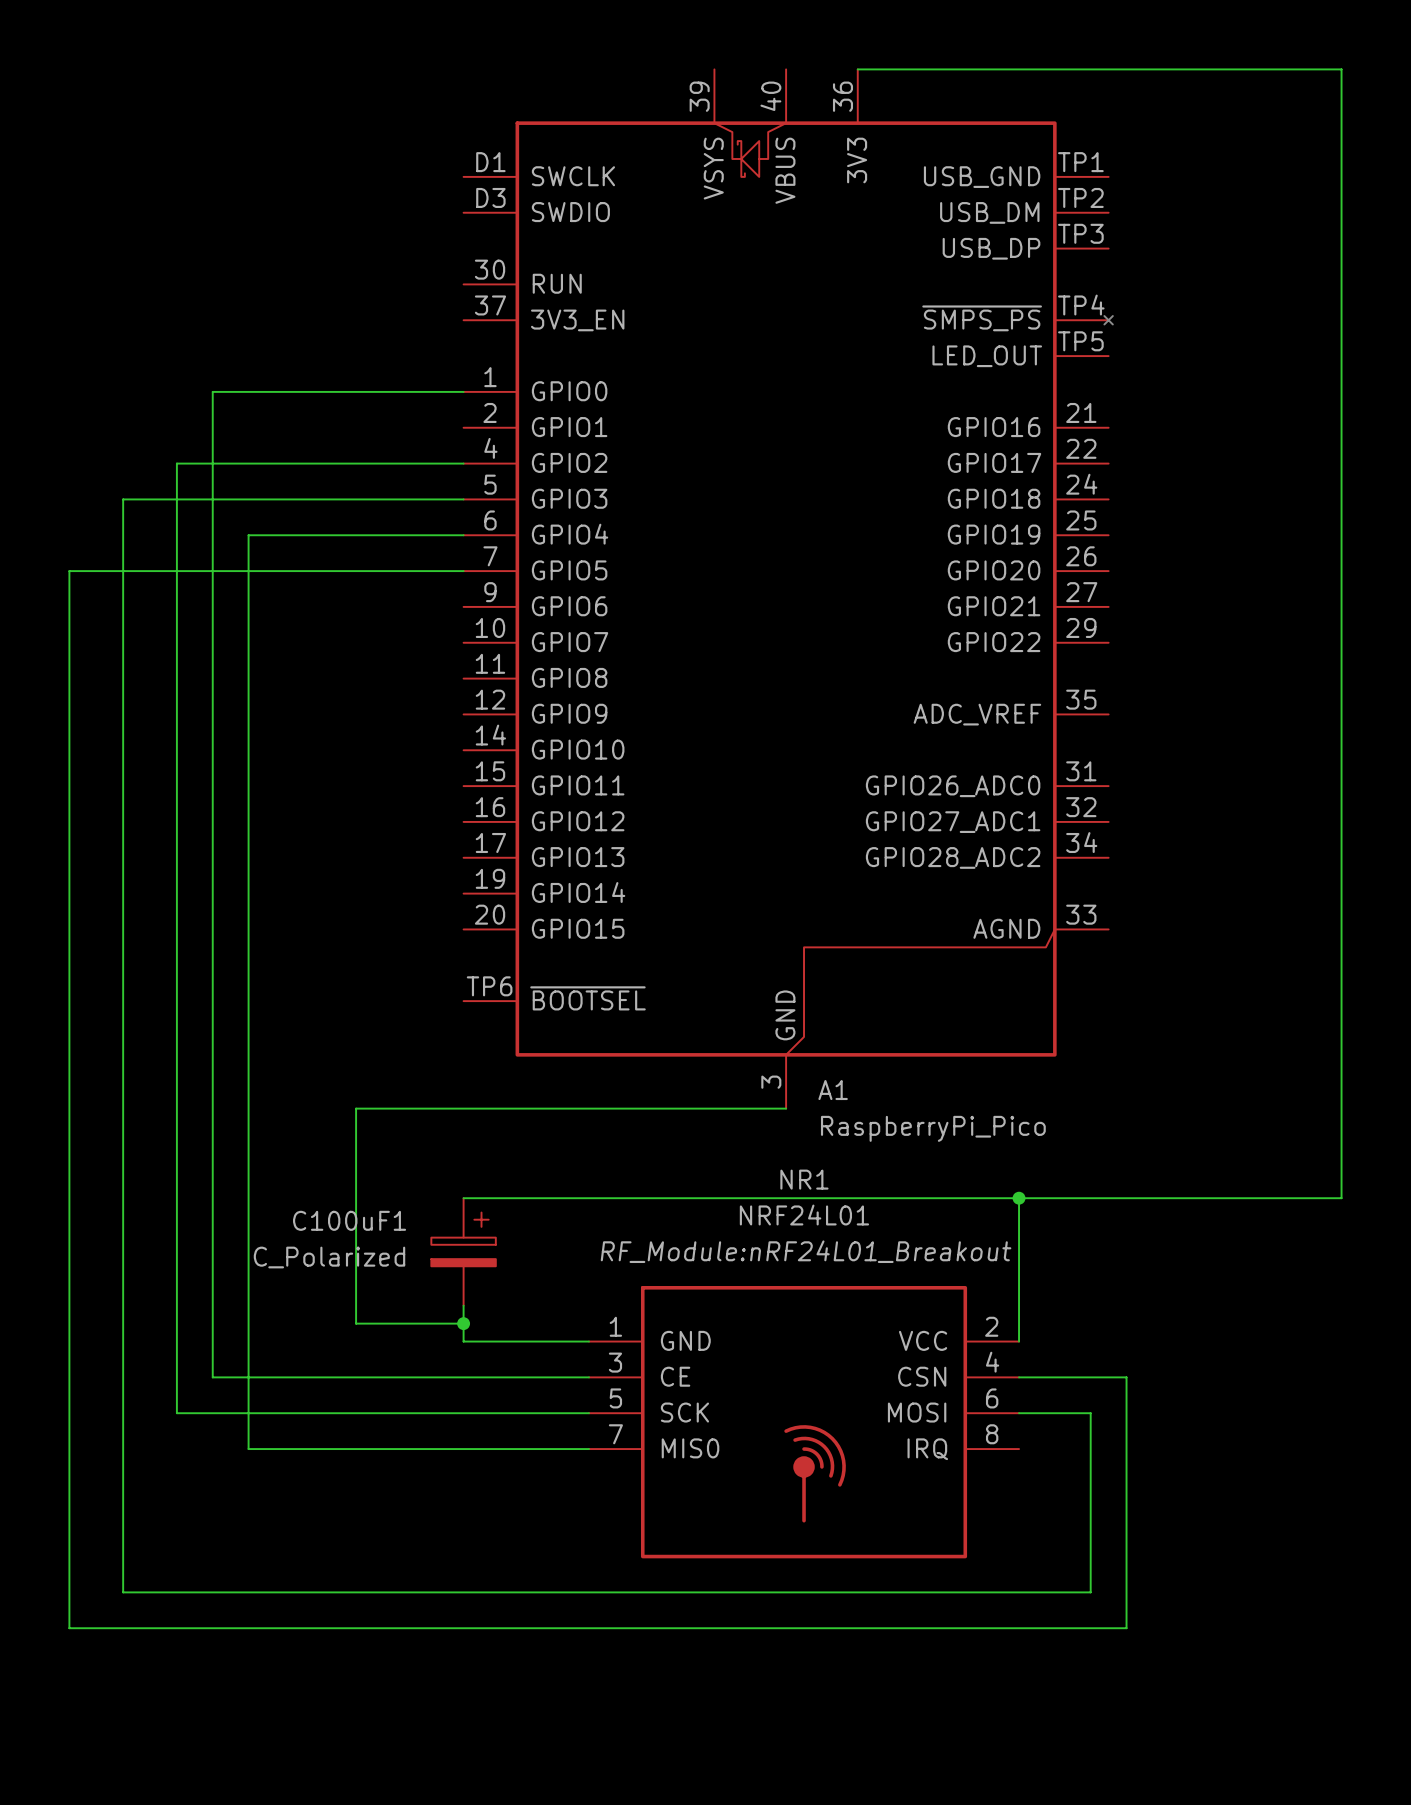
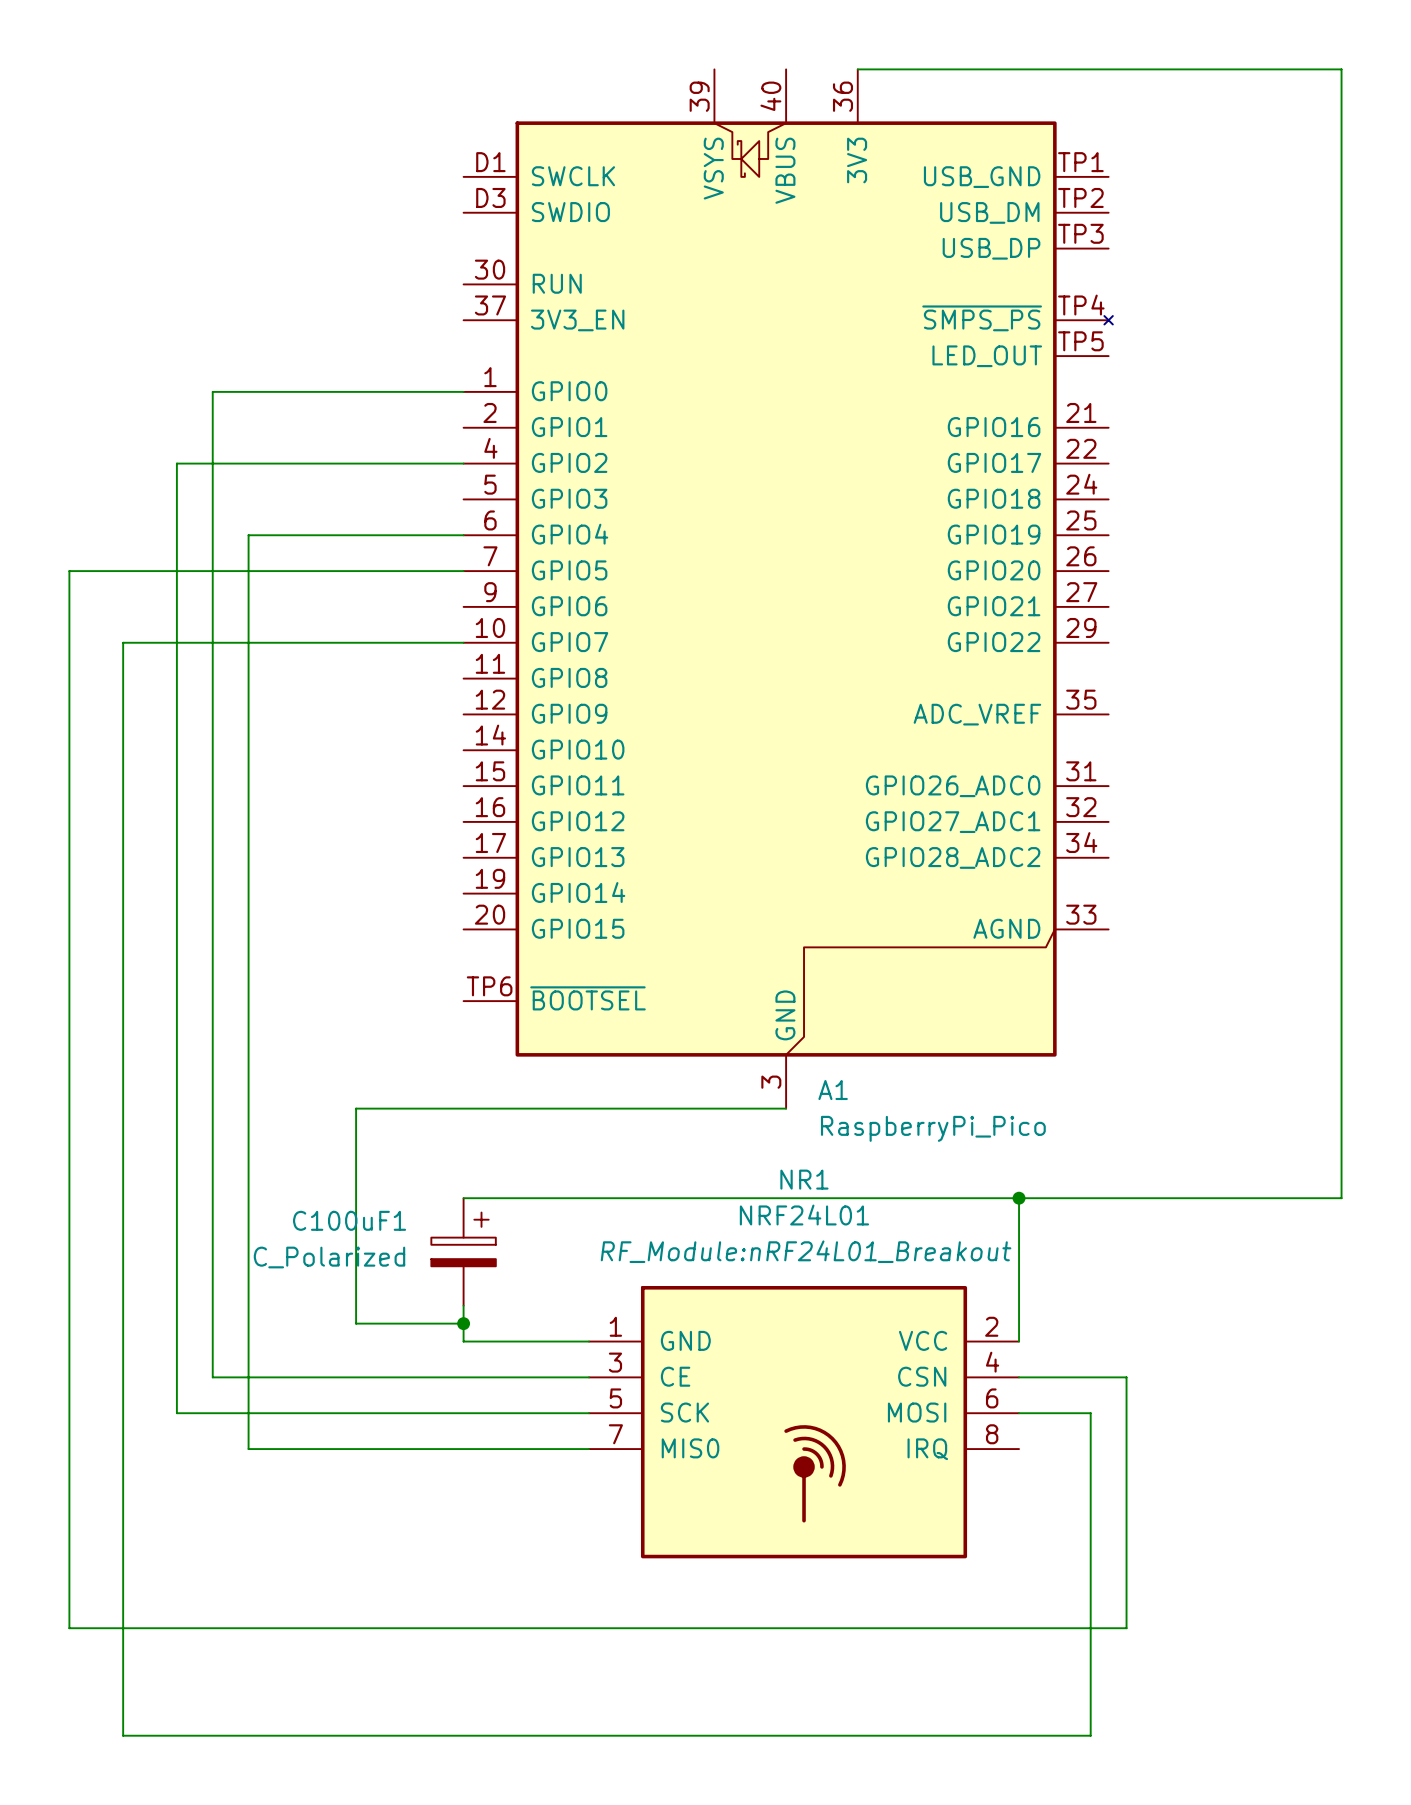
wire: (463, 499) (123, 499) (123, 642) -> (463, 642) (123, 642)
wire: (123, 1592) (1090, 1592) -> (123, 1592) (123, 1735) (1090, 1735) (1090, 1592)

